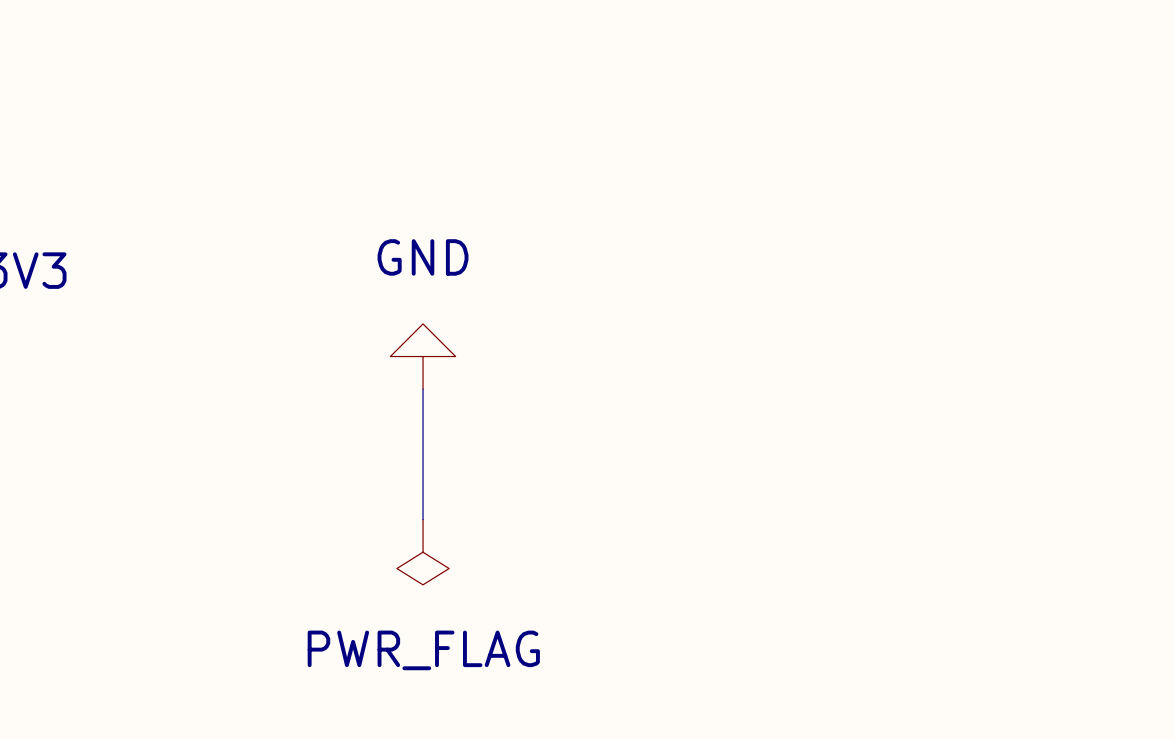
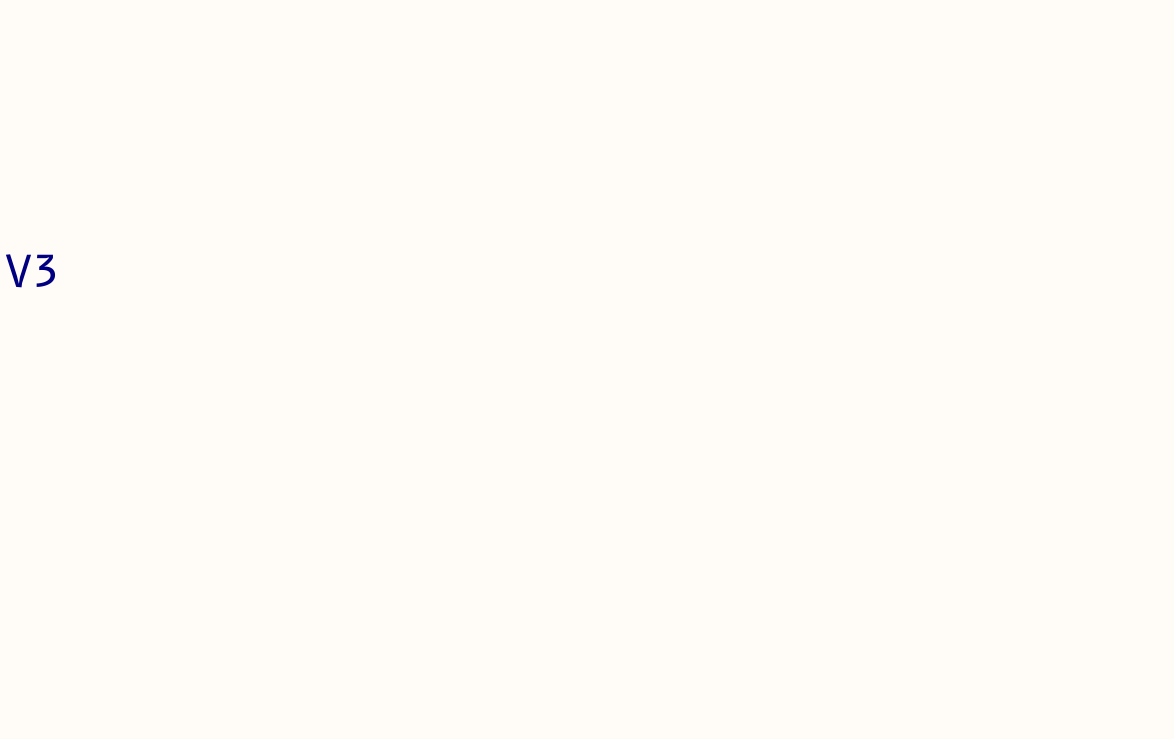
power symbol: GND (423, 356) -> none
wire: (423, 389) (423, 519) -> none
power symbol: PWR_FLAG (423, 552) -> none

